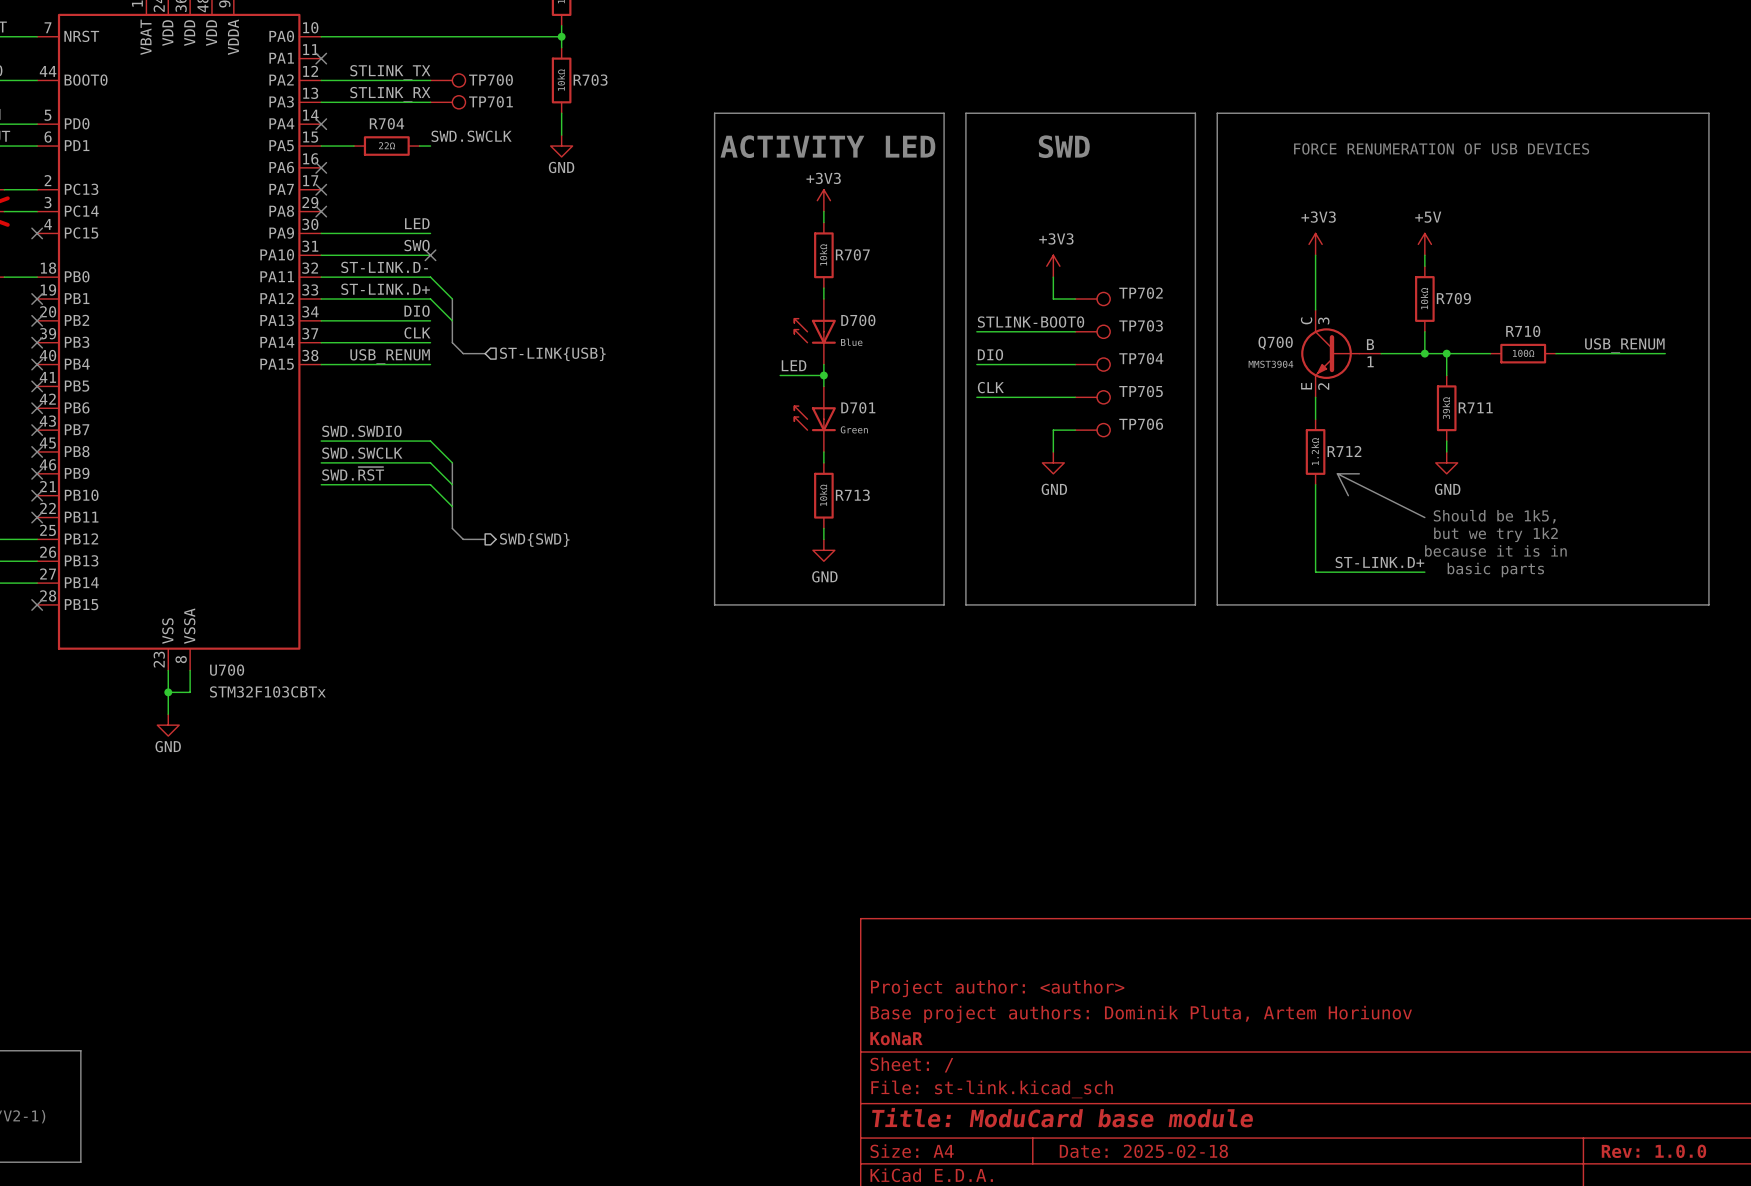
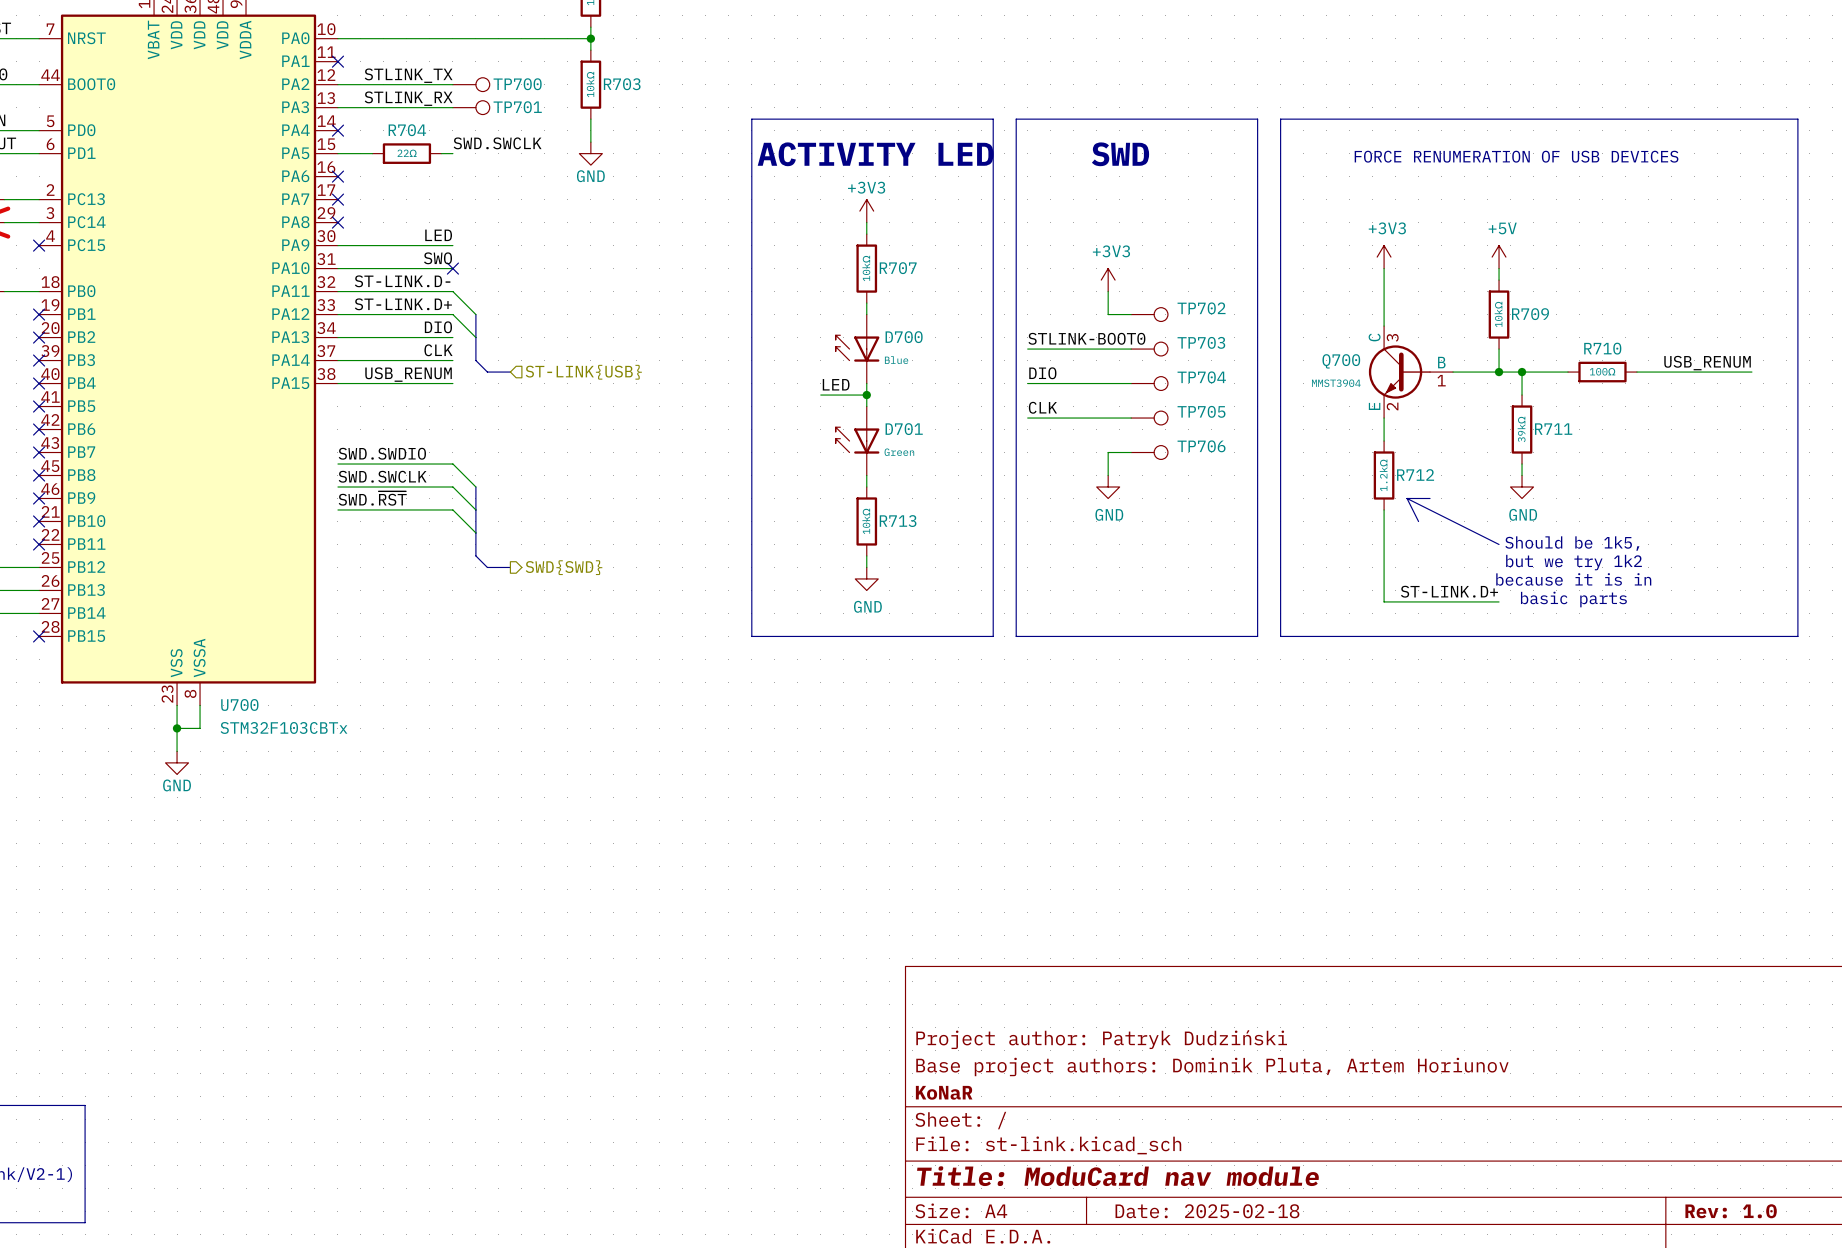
title block: Project author: <author> (997, 988) -> Project author: Patryk Dudziński (1101, 1039)
title block: Title: ModuCard base module (1062, 1117) -> Title: ModuCard nav module (1117, 1176)
title block: Rev: 1.0.0 (1653, 1151) -> Rev: 1.0 (1731, 1211)

